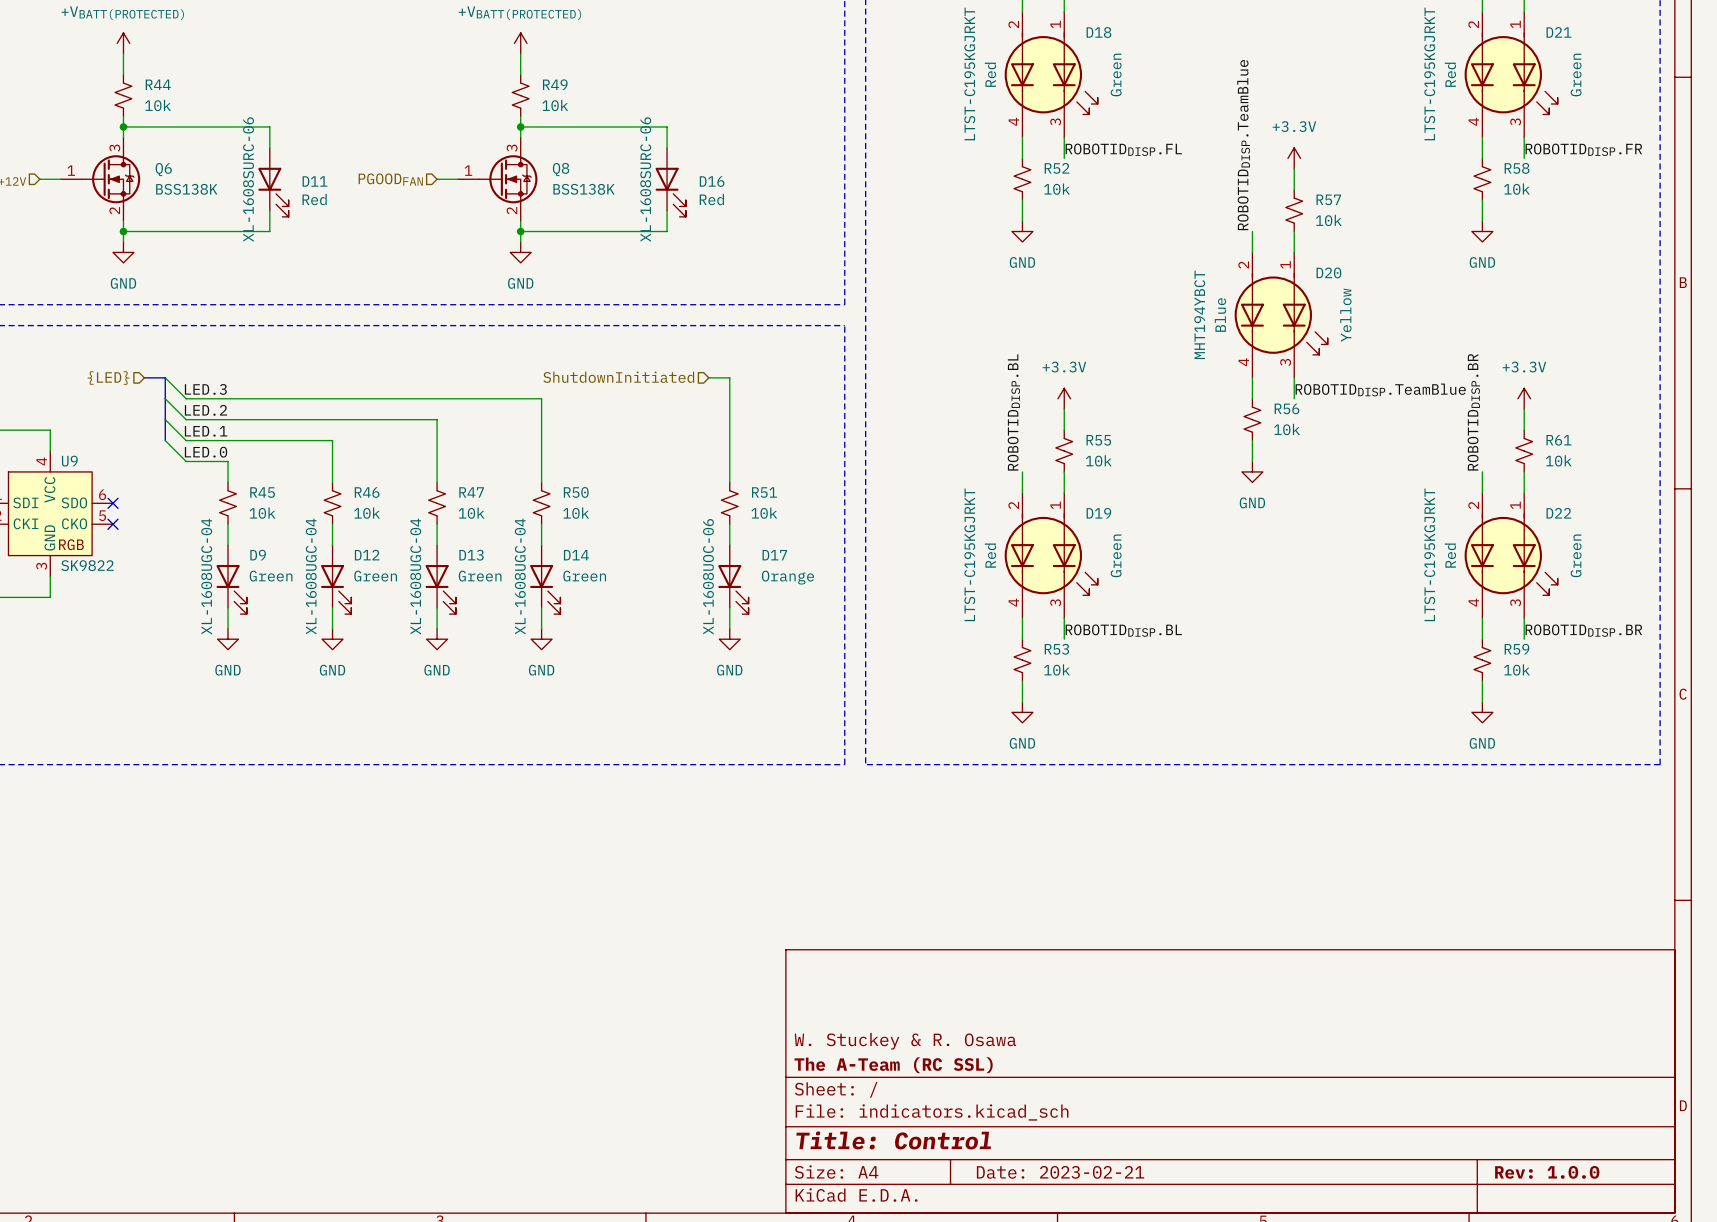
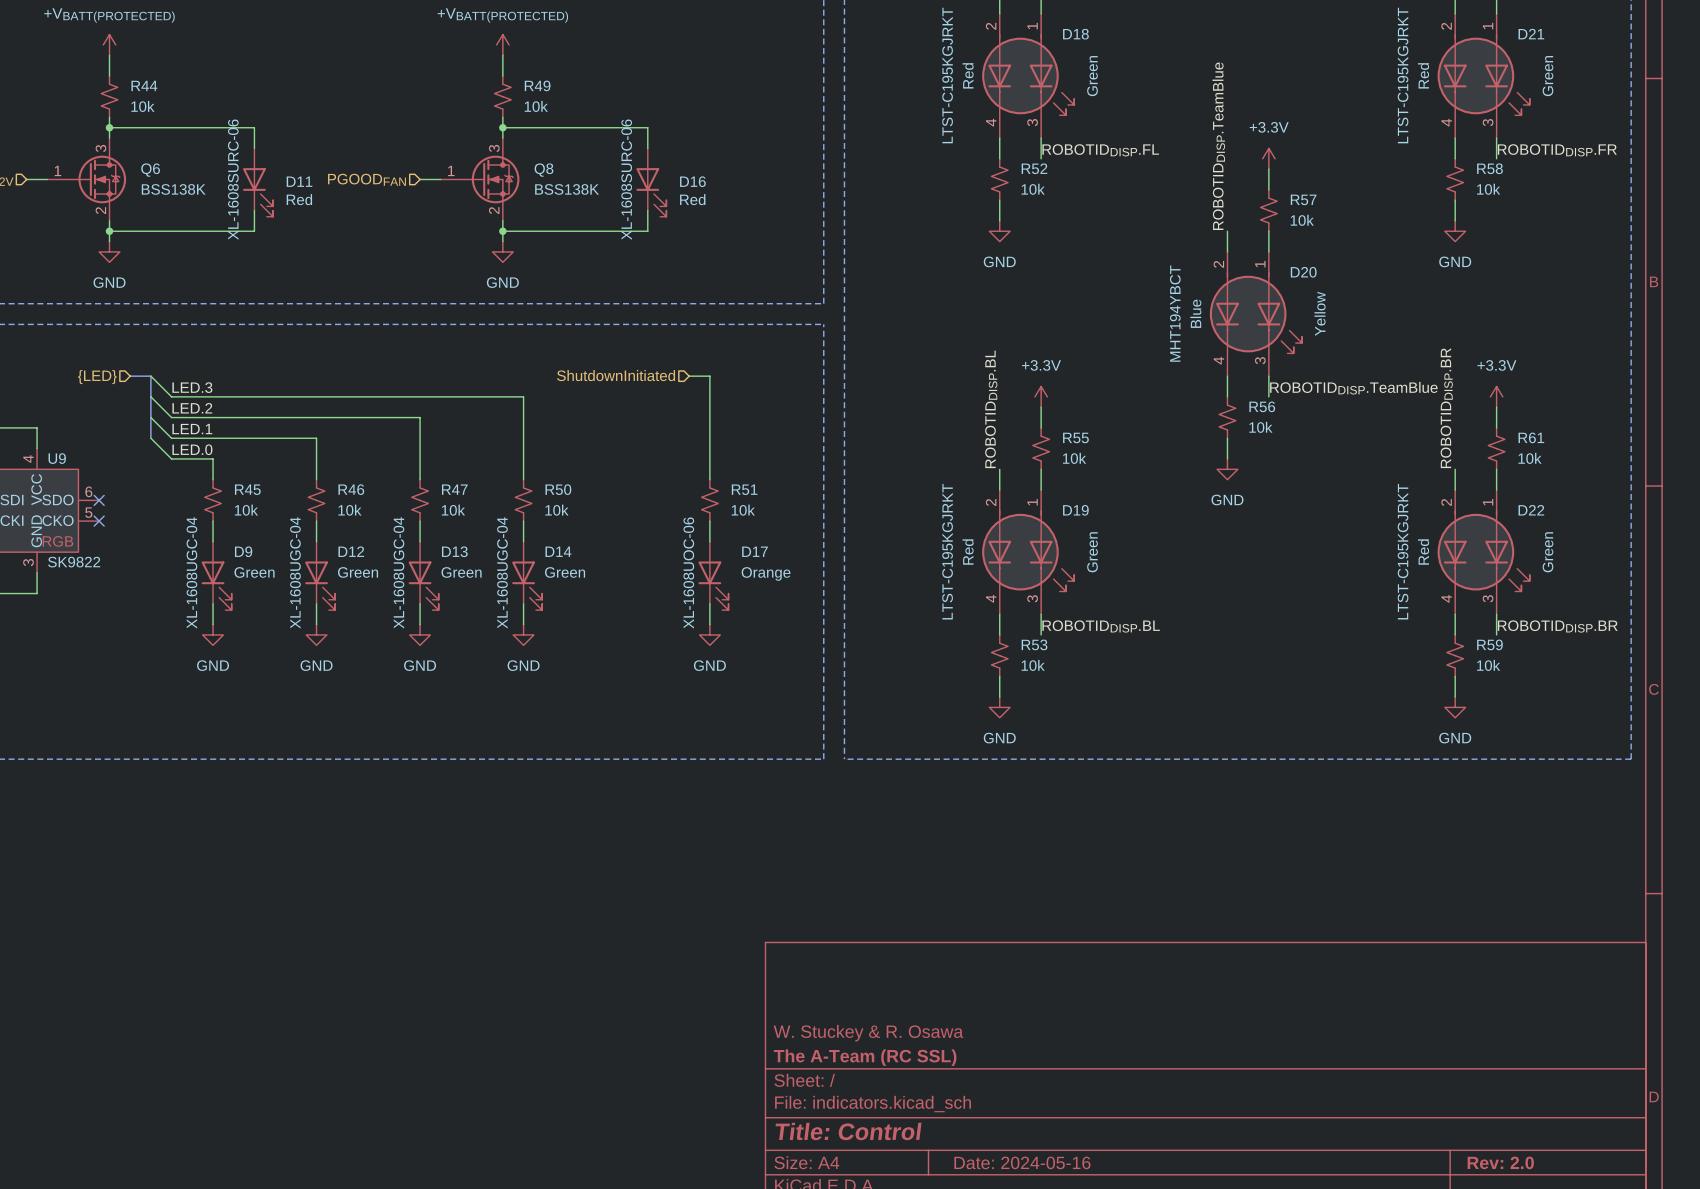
title block: Date: 2023-02-21 (1060, 1172) -> Date: 2024-05-16 (1022, 1162)
title block: Rev: 1.0.0 (1547, 1172) -> Rev: 2.0 (1500, 1162)

